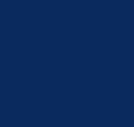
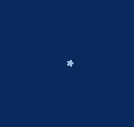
text: none -> * (70, 63)

